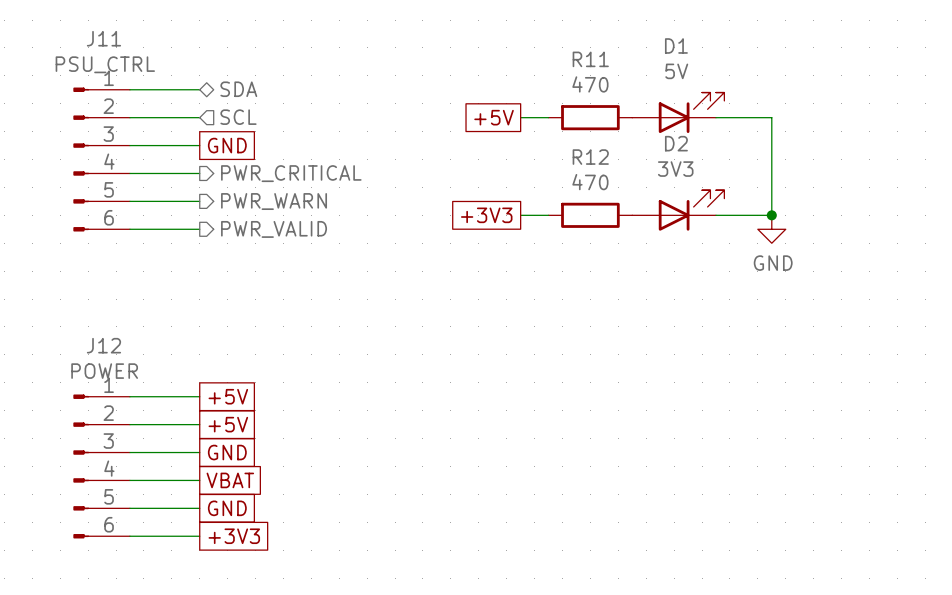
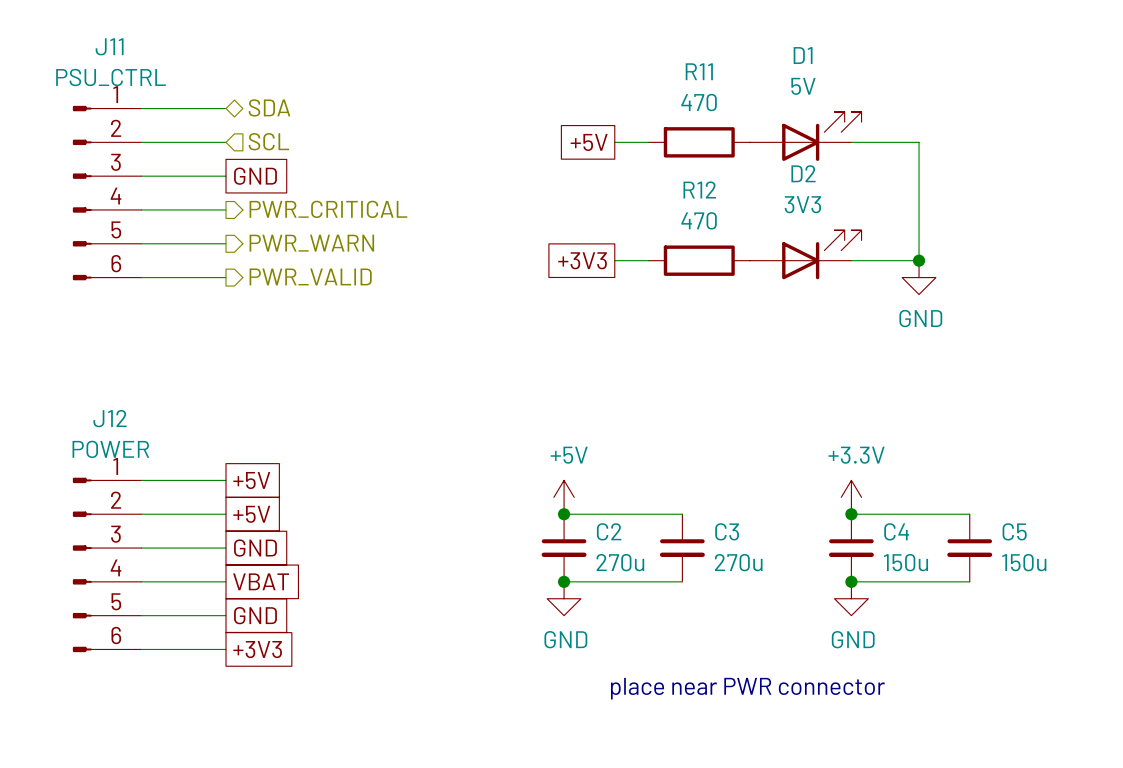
power symbol: none -> +5V (564, 497)
power symbol: none -> +3.3V (851, 497)
wire: none -> (564, 514) (682, 514)
junction: none -> (564, 514)
wire: none -> (851, 514) (969, 514)
junction: none -> (851, 514)
C2: none -> 270u (564, 548)
C3: none -> 270u (682, 548)
C4: none -> 150u (851, 548)
C5: none -> 150u (969, 548)
wire: none -> (564, 581) (682, 581)
junction: none -> (564, 581)
wire: none -> (851, 581) (969, 581)
junction: none -> (851, 581)
power symbol: none -> GND (564, 598)
power symbol: none -> GND (851, 598)
text: none -> place near PWR connector (747, 688)

